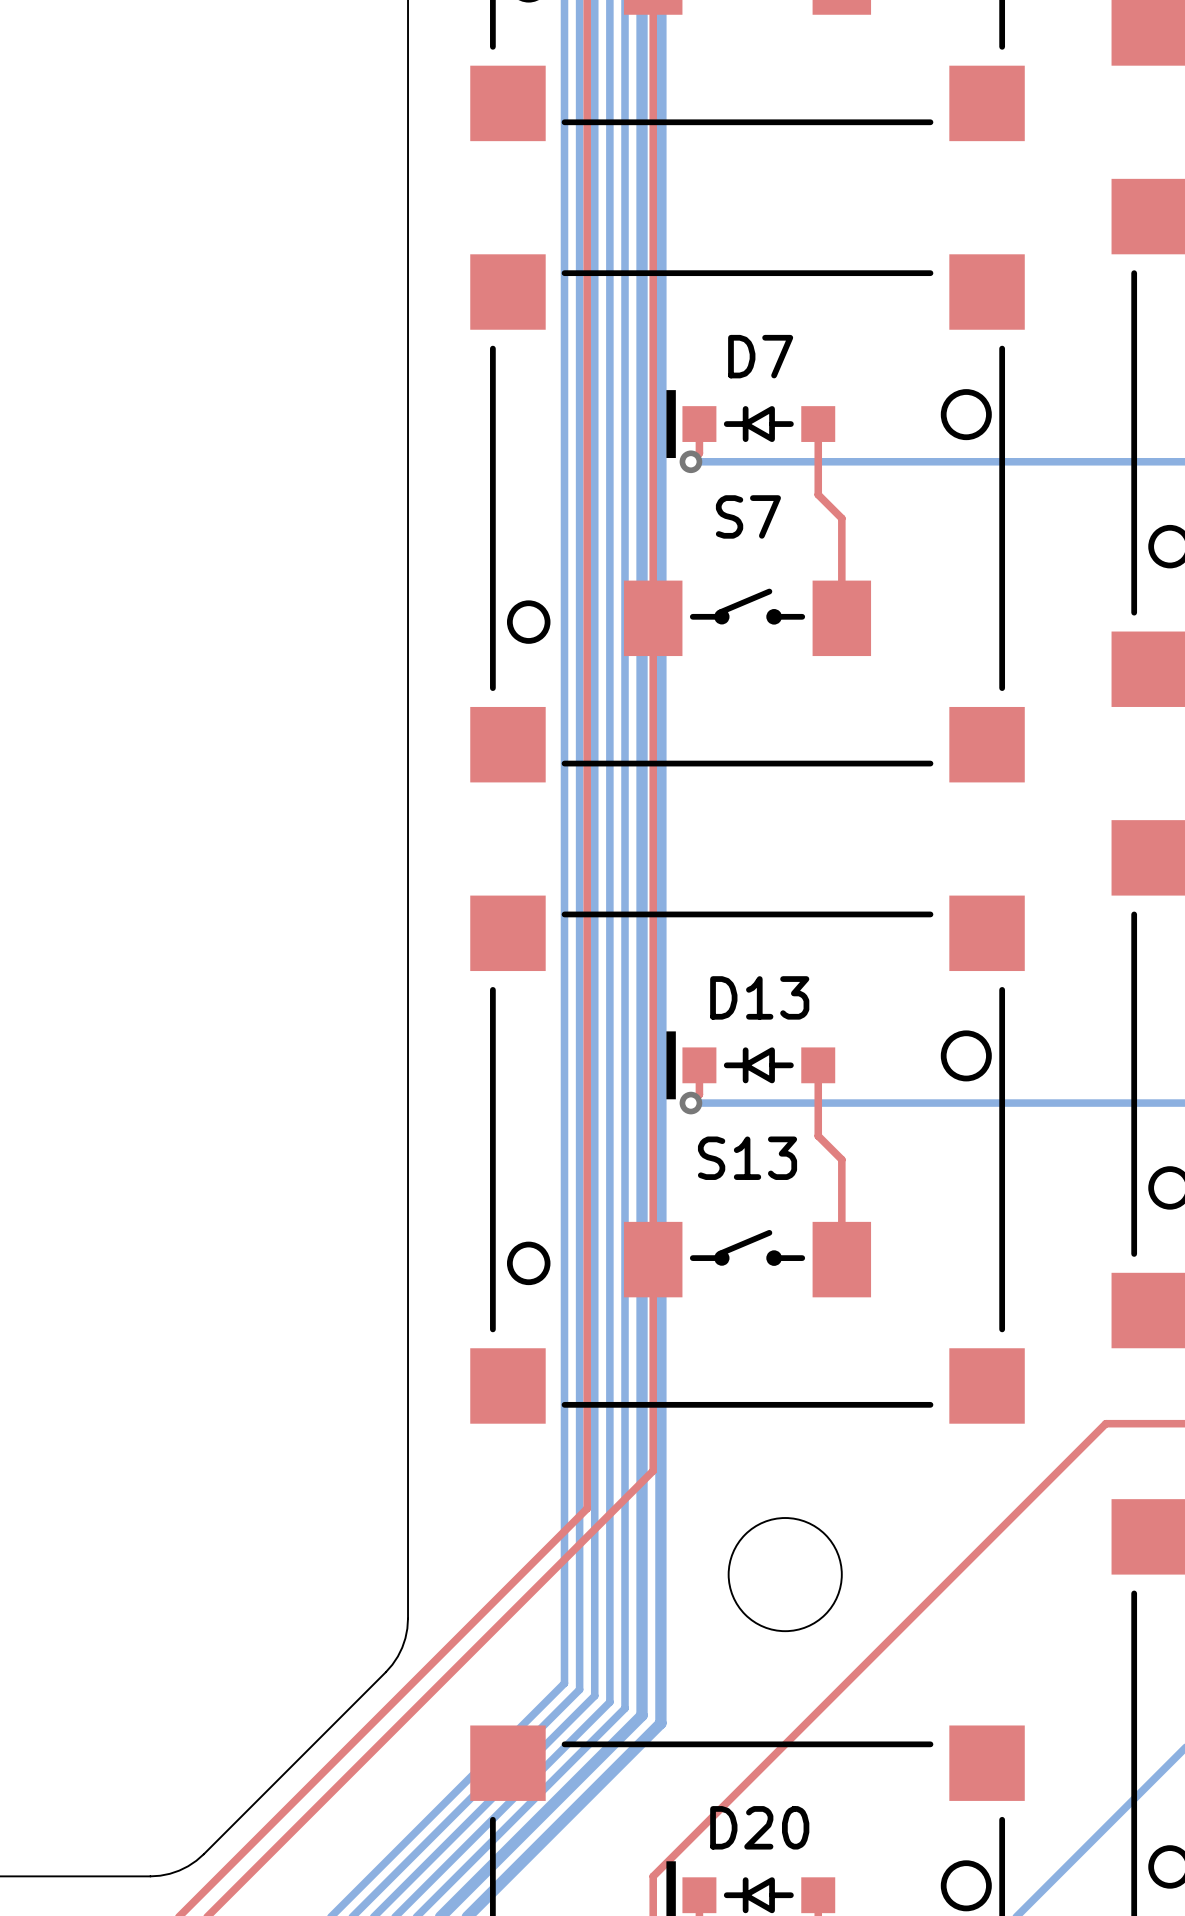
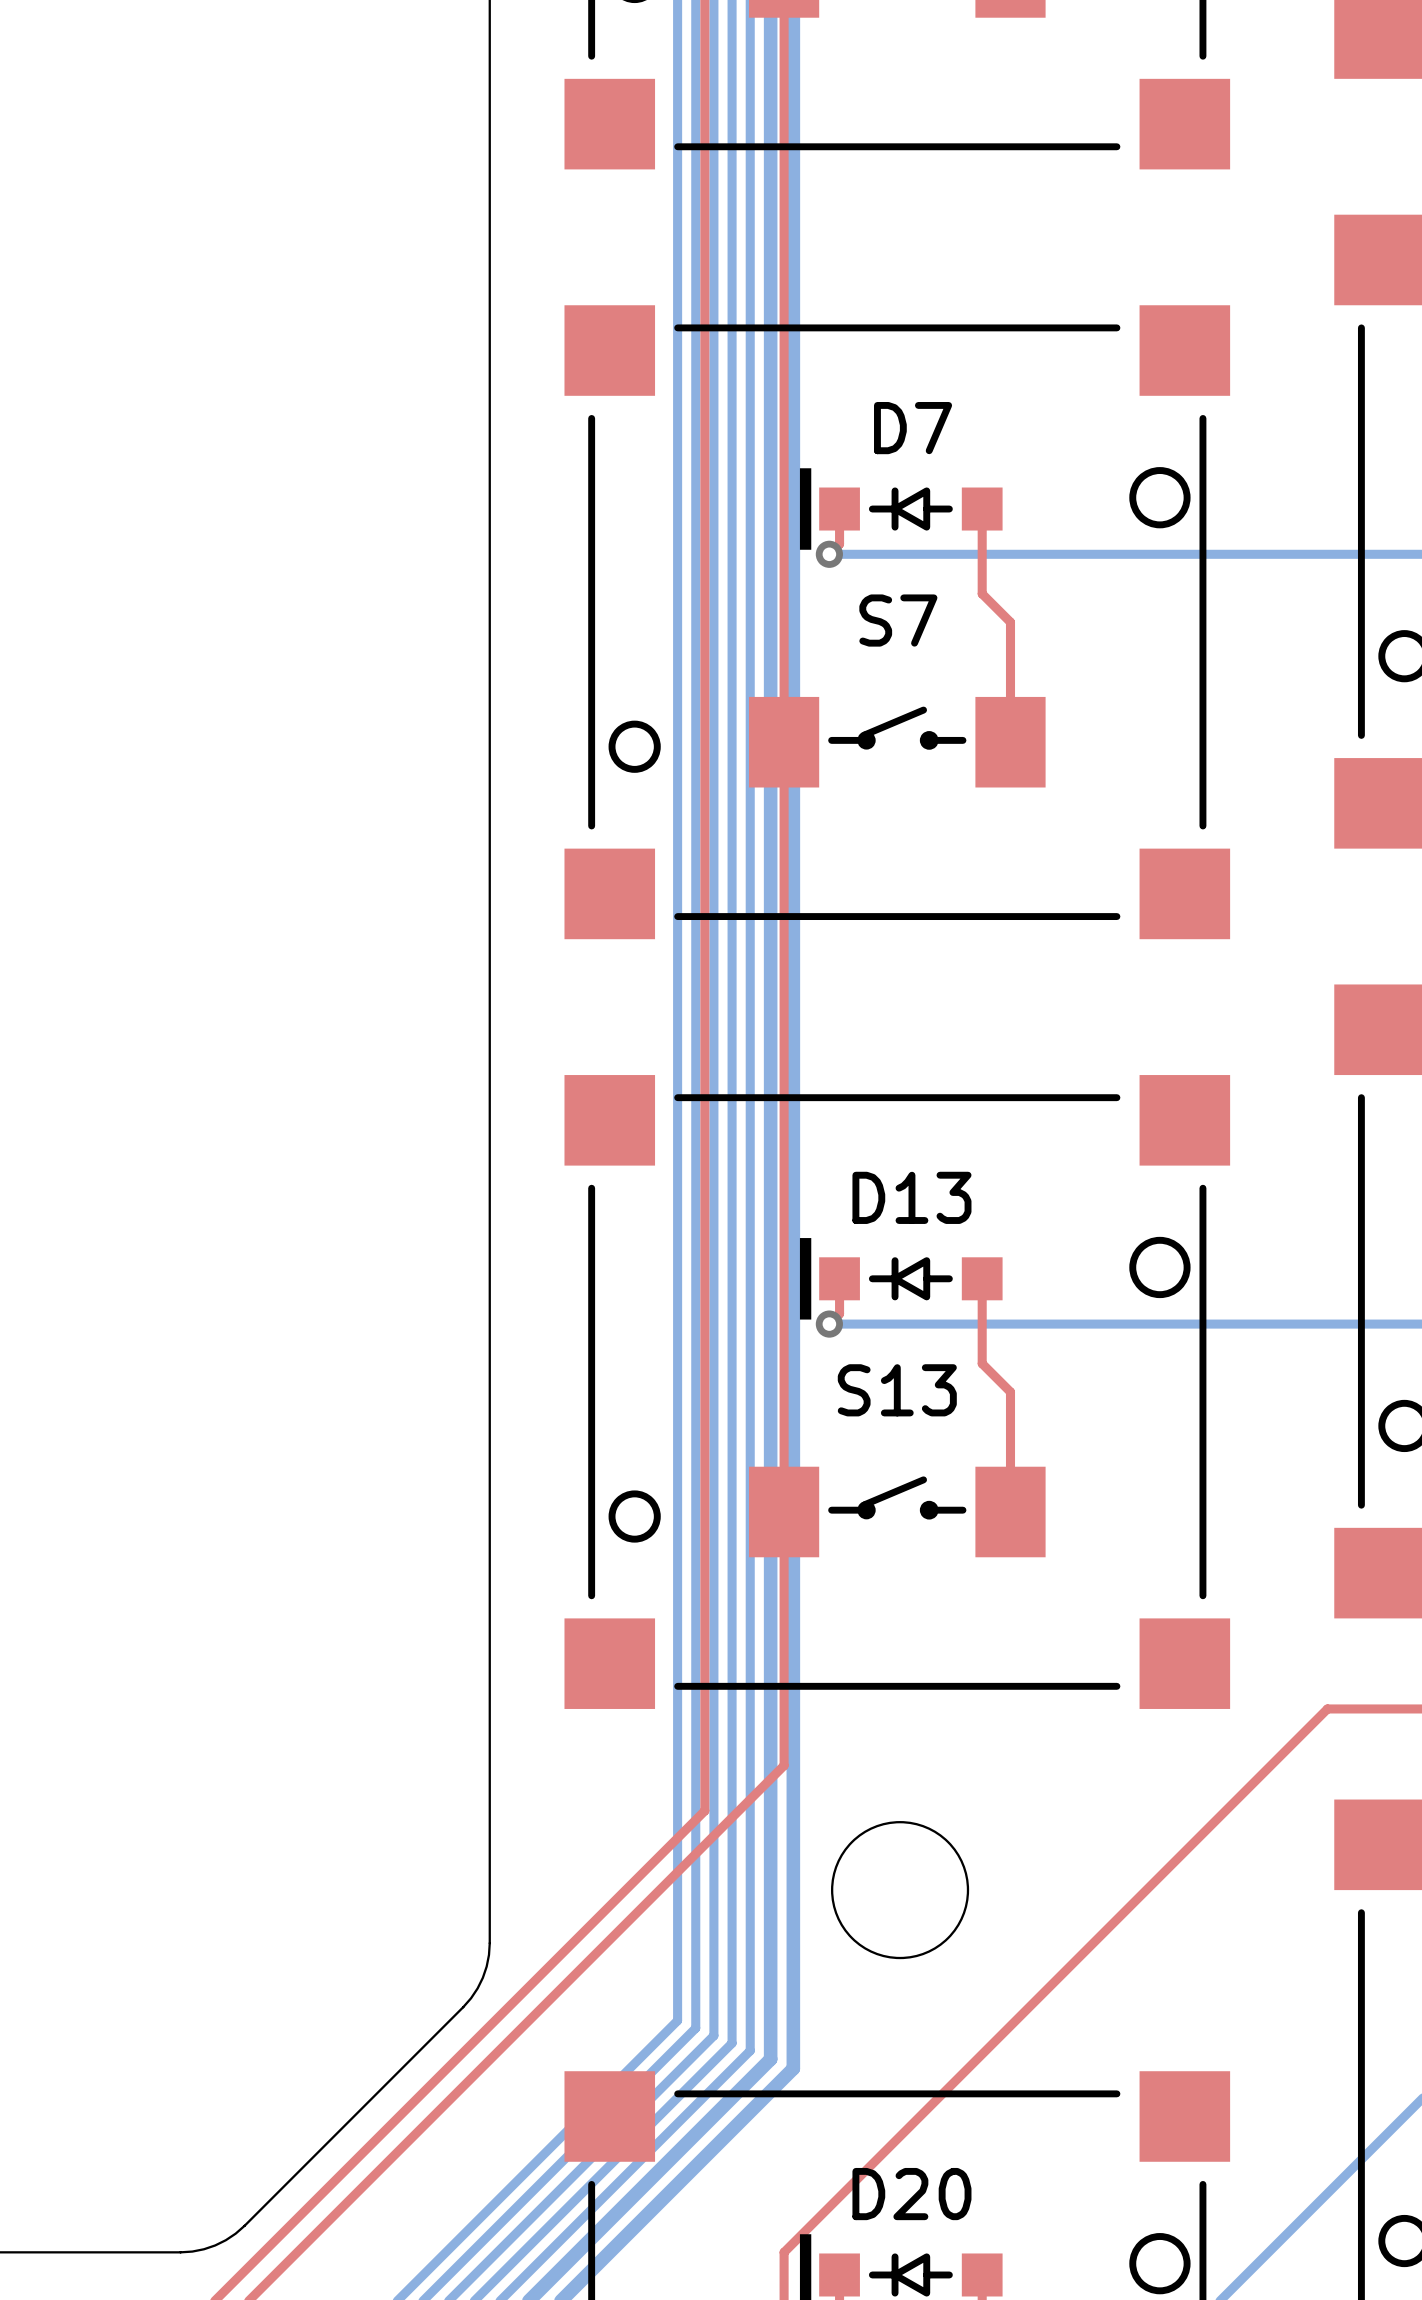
round board edge position: (785, 1574) -> (900, 1890)

